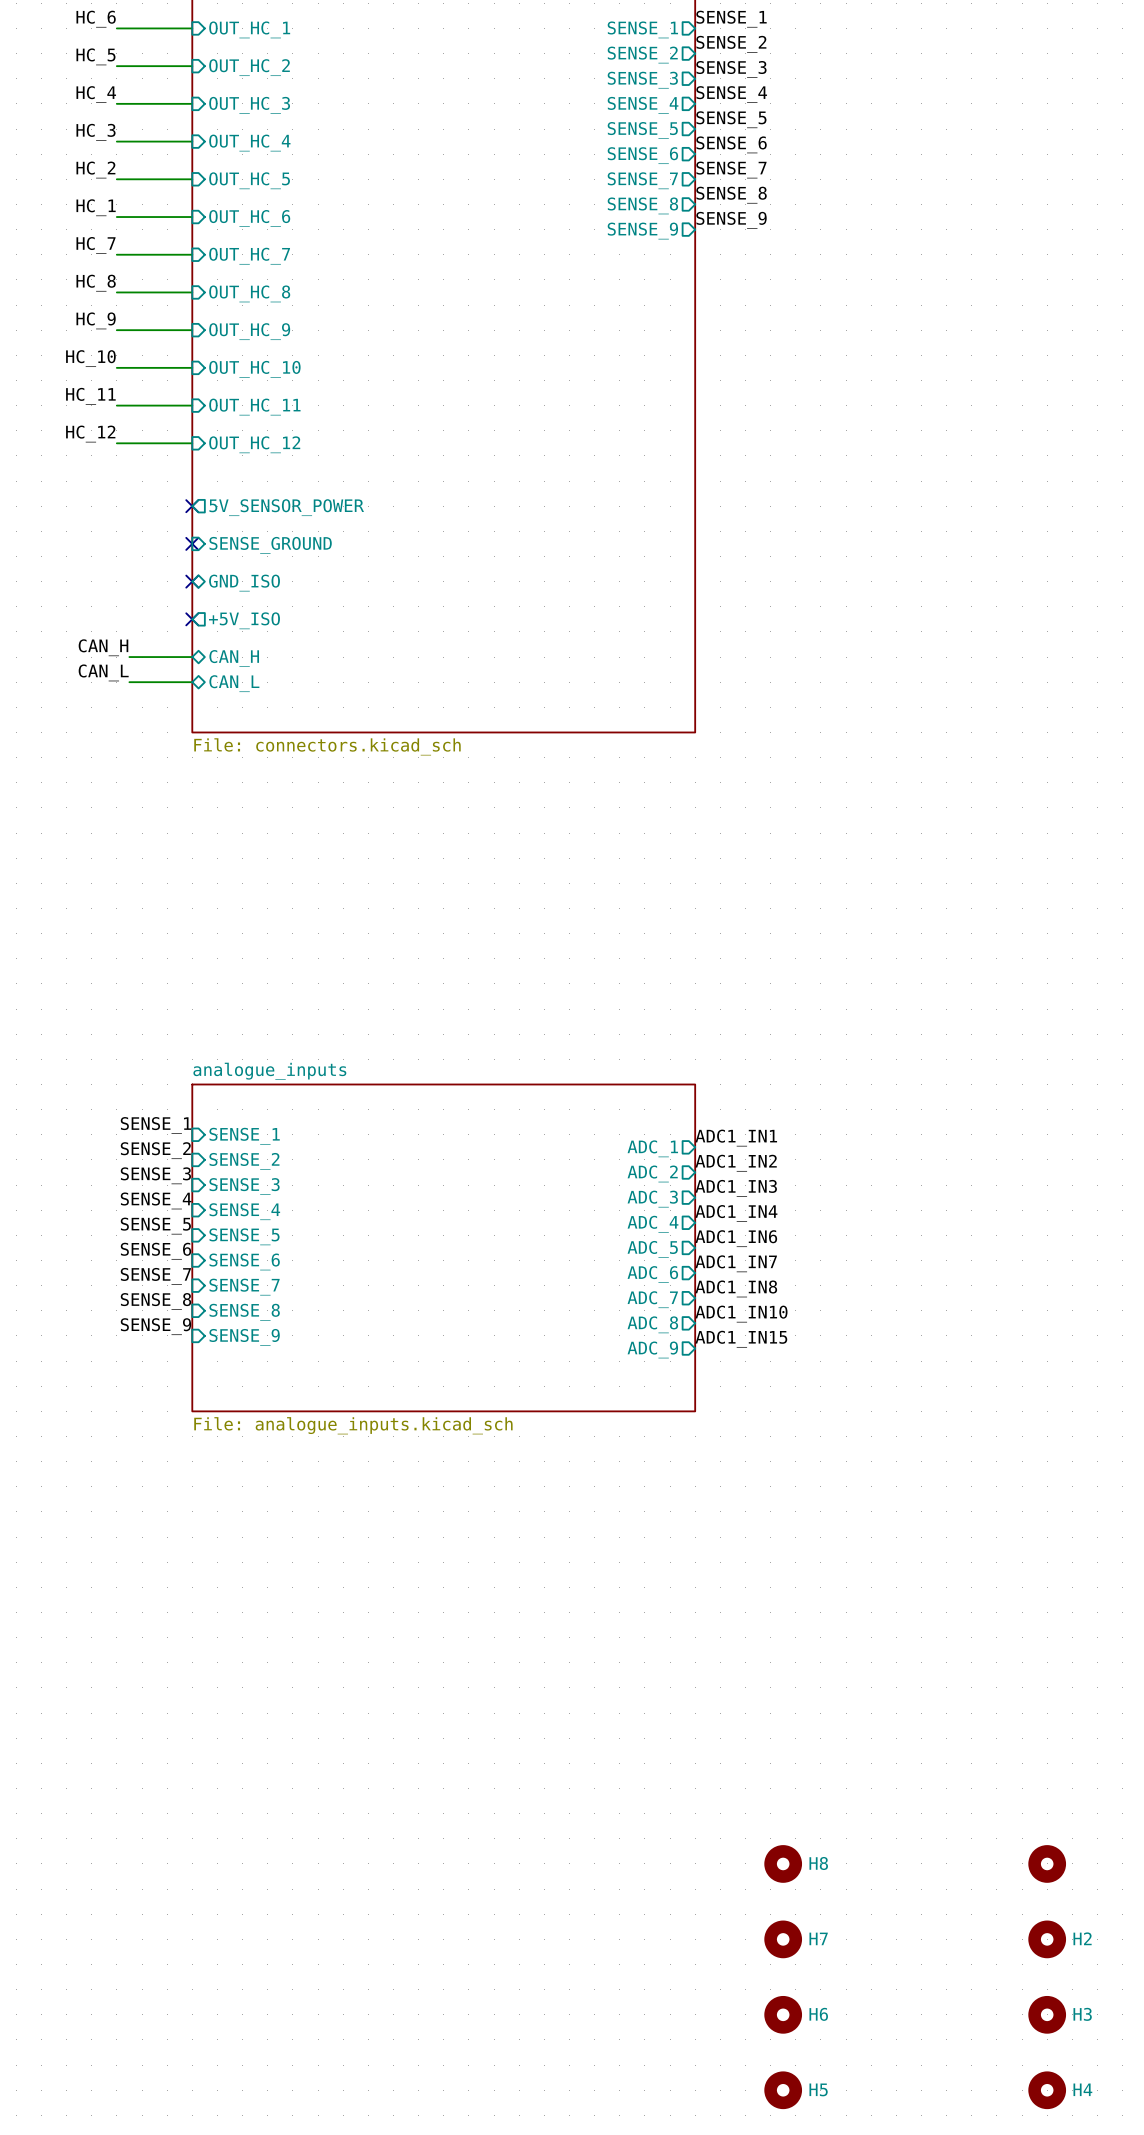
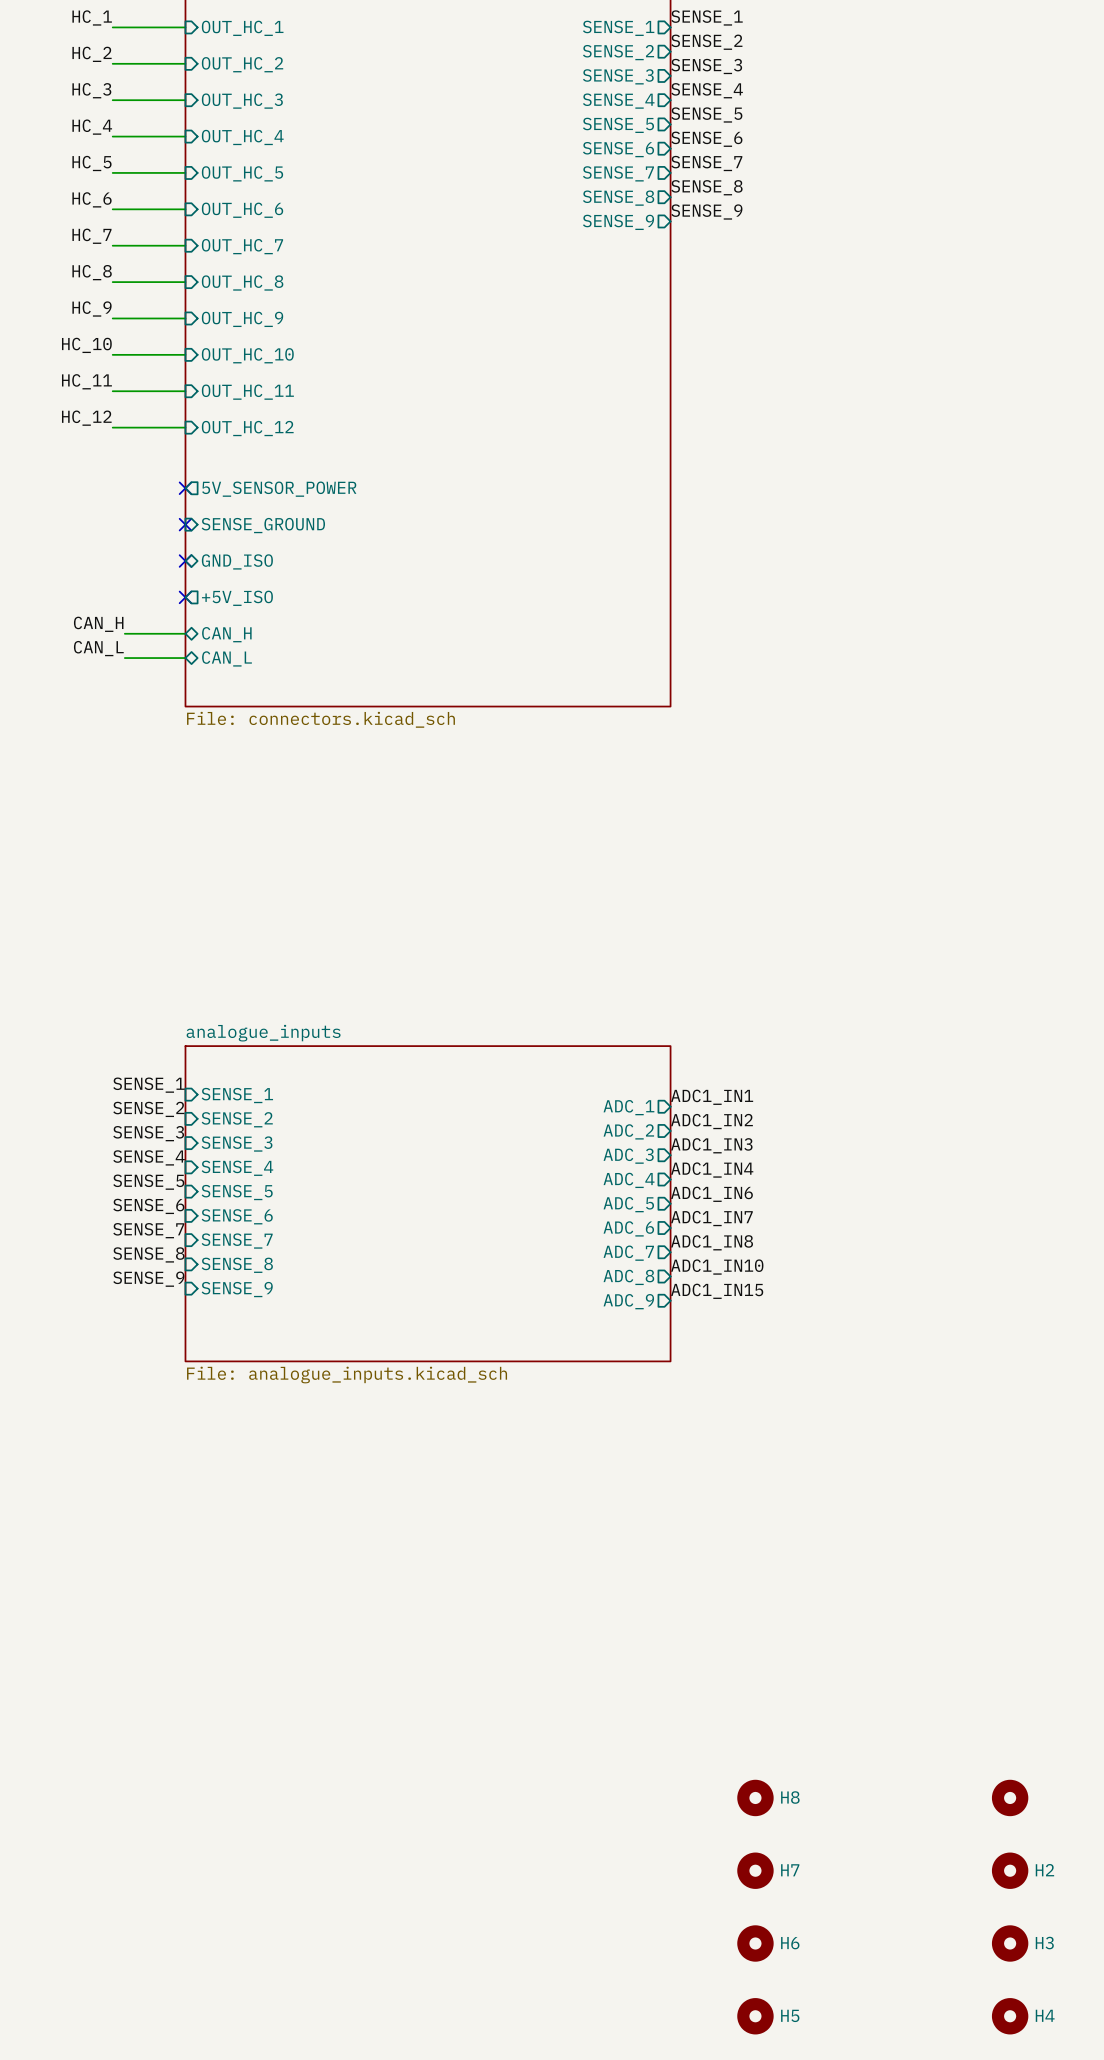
label: HC_6 (96, 19) -> HC_1 (92, 17)
label: HC_5 (95, 56) -> HC_2 (92, 54)
label: HC_4 (96, 94) -> HC_3 (91, 90)
label: HC_3 (96, 132) -> HC_4 (92, 127)
label: HC_2 (95, 170) -> HC_5 (91, 163)
label: HC_1 (96, 207) -> HC_6 (92, 199)

